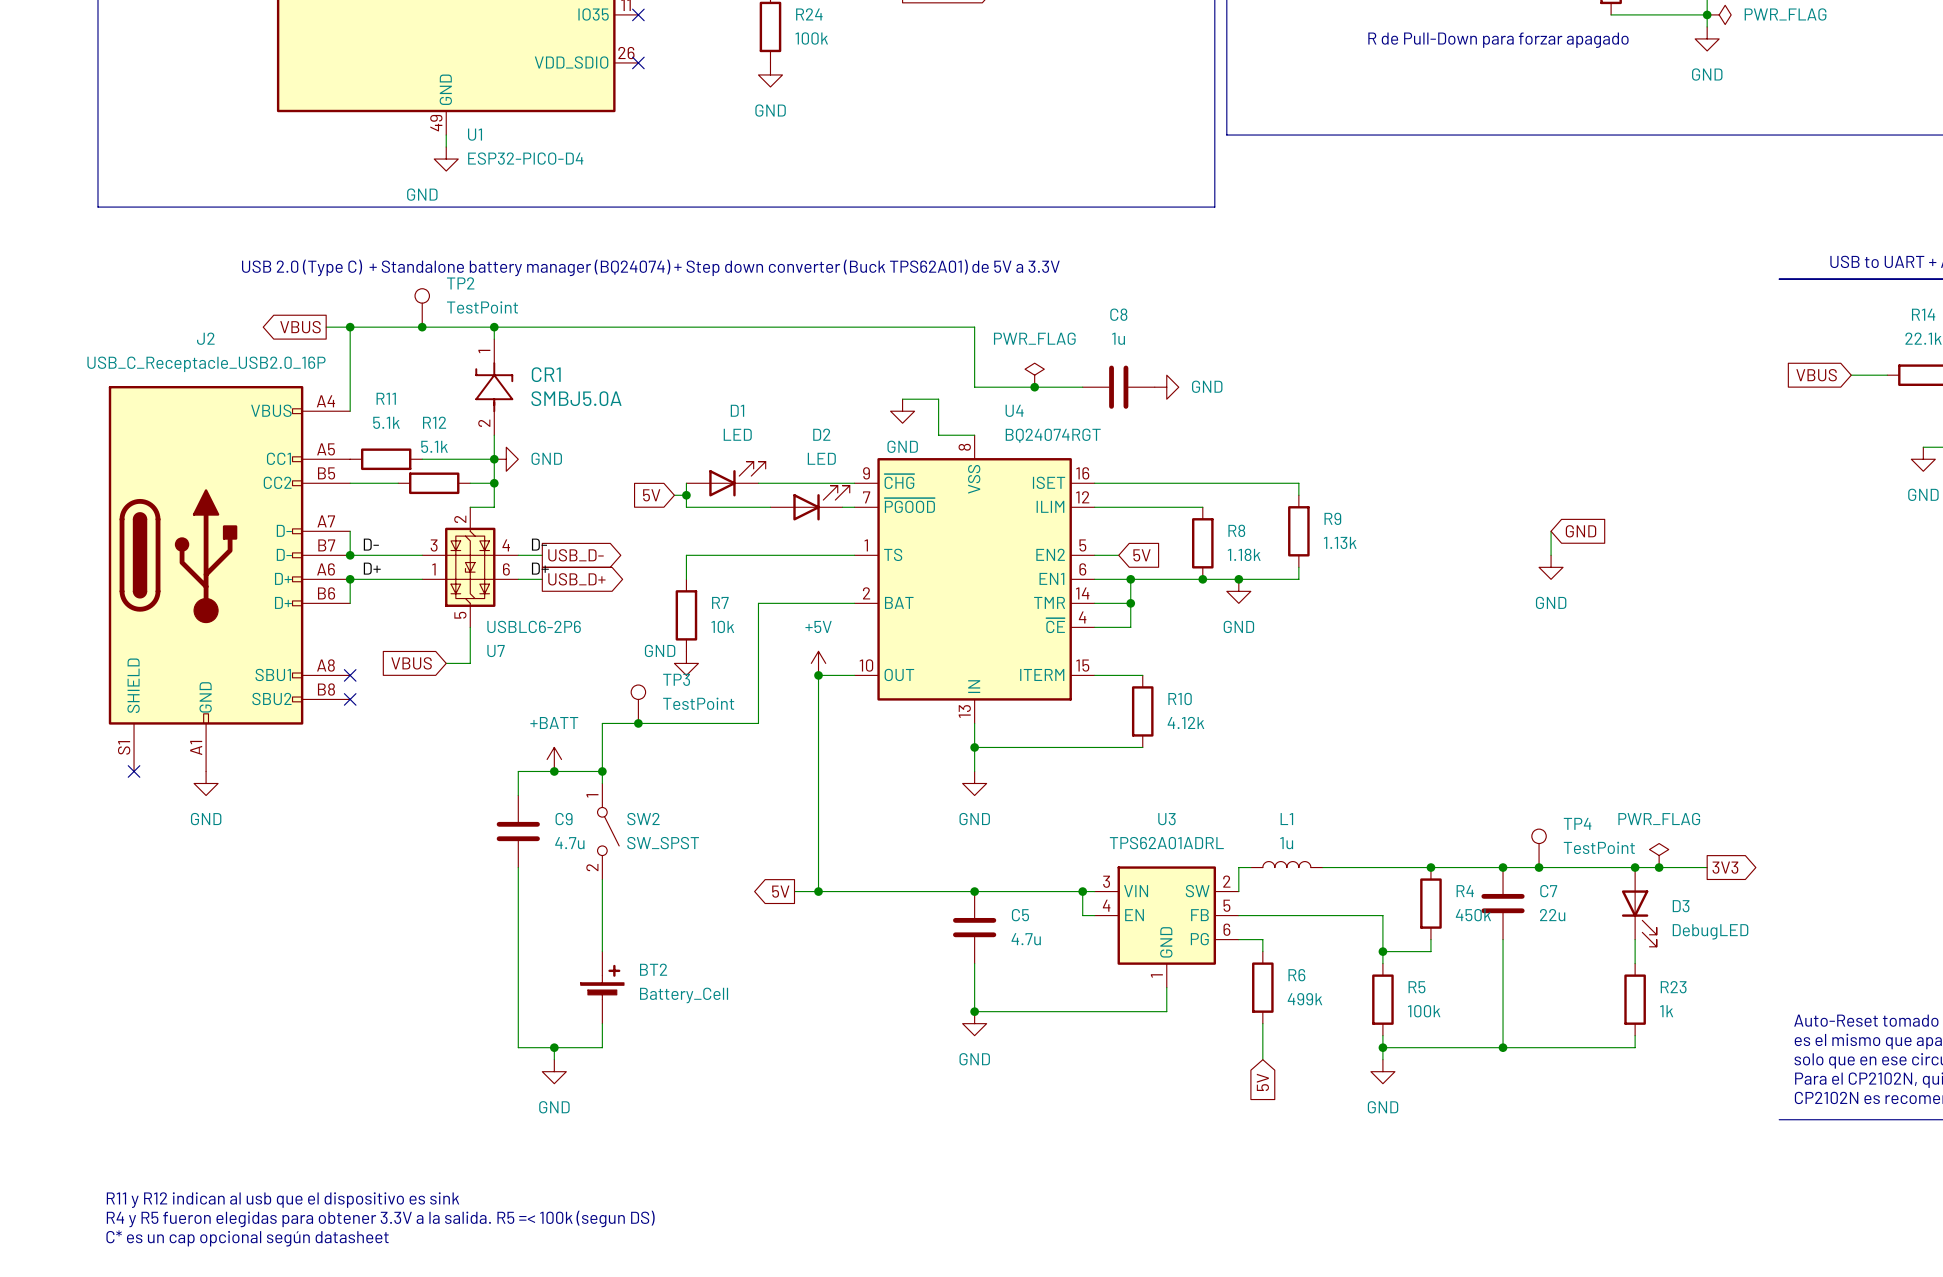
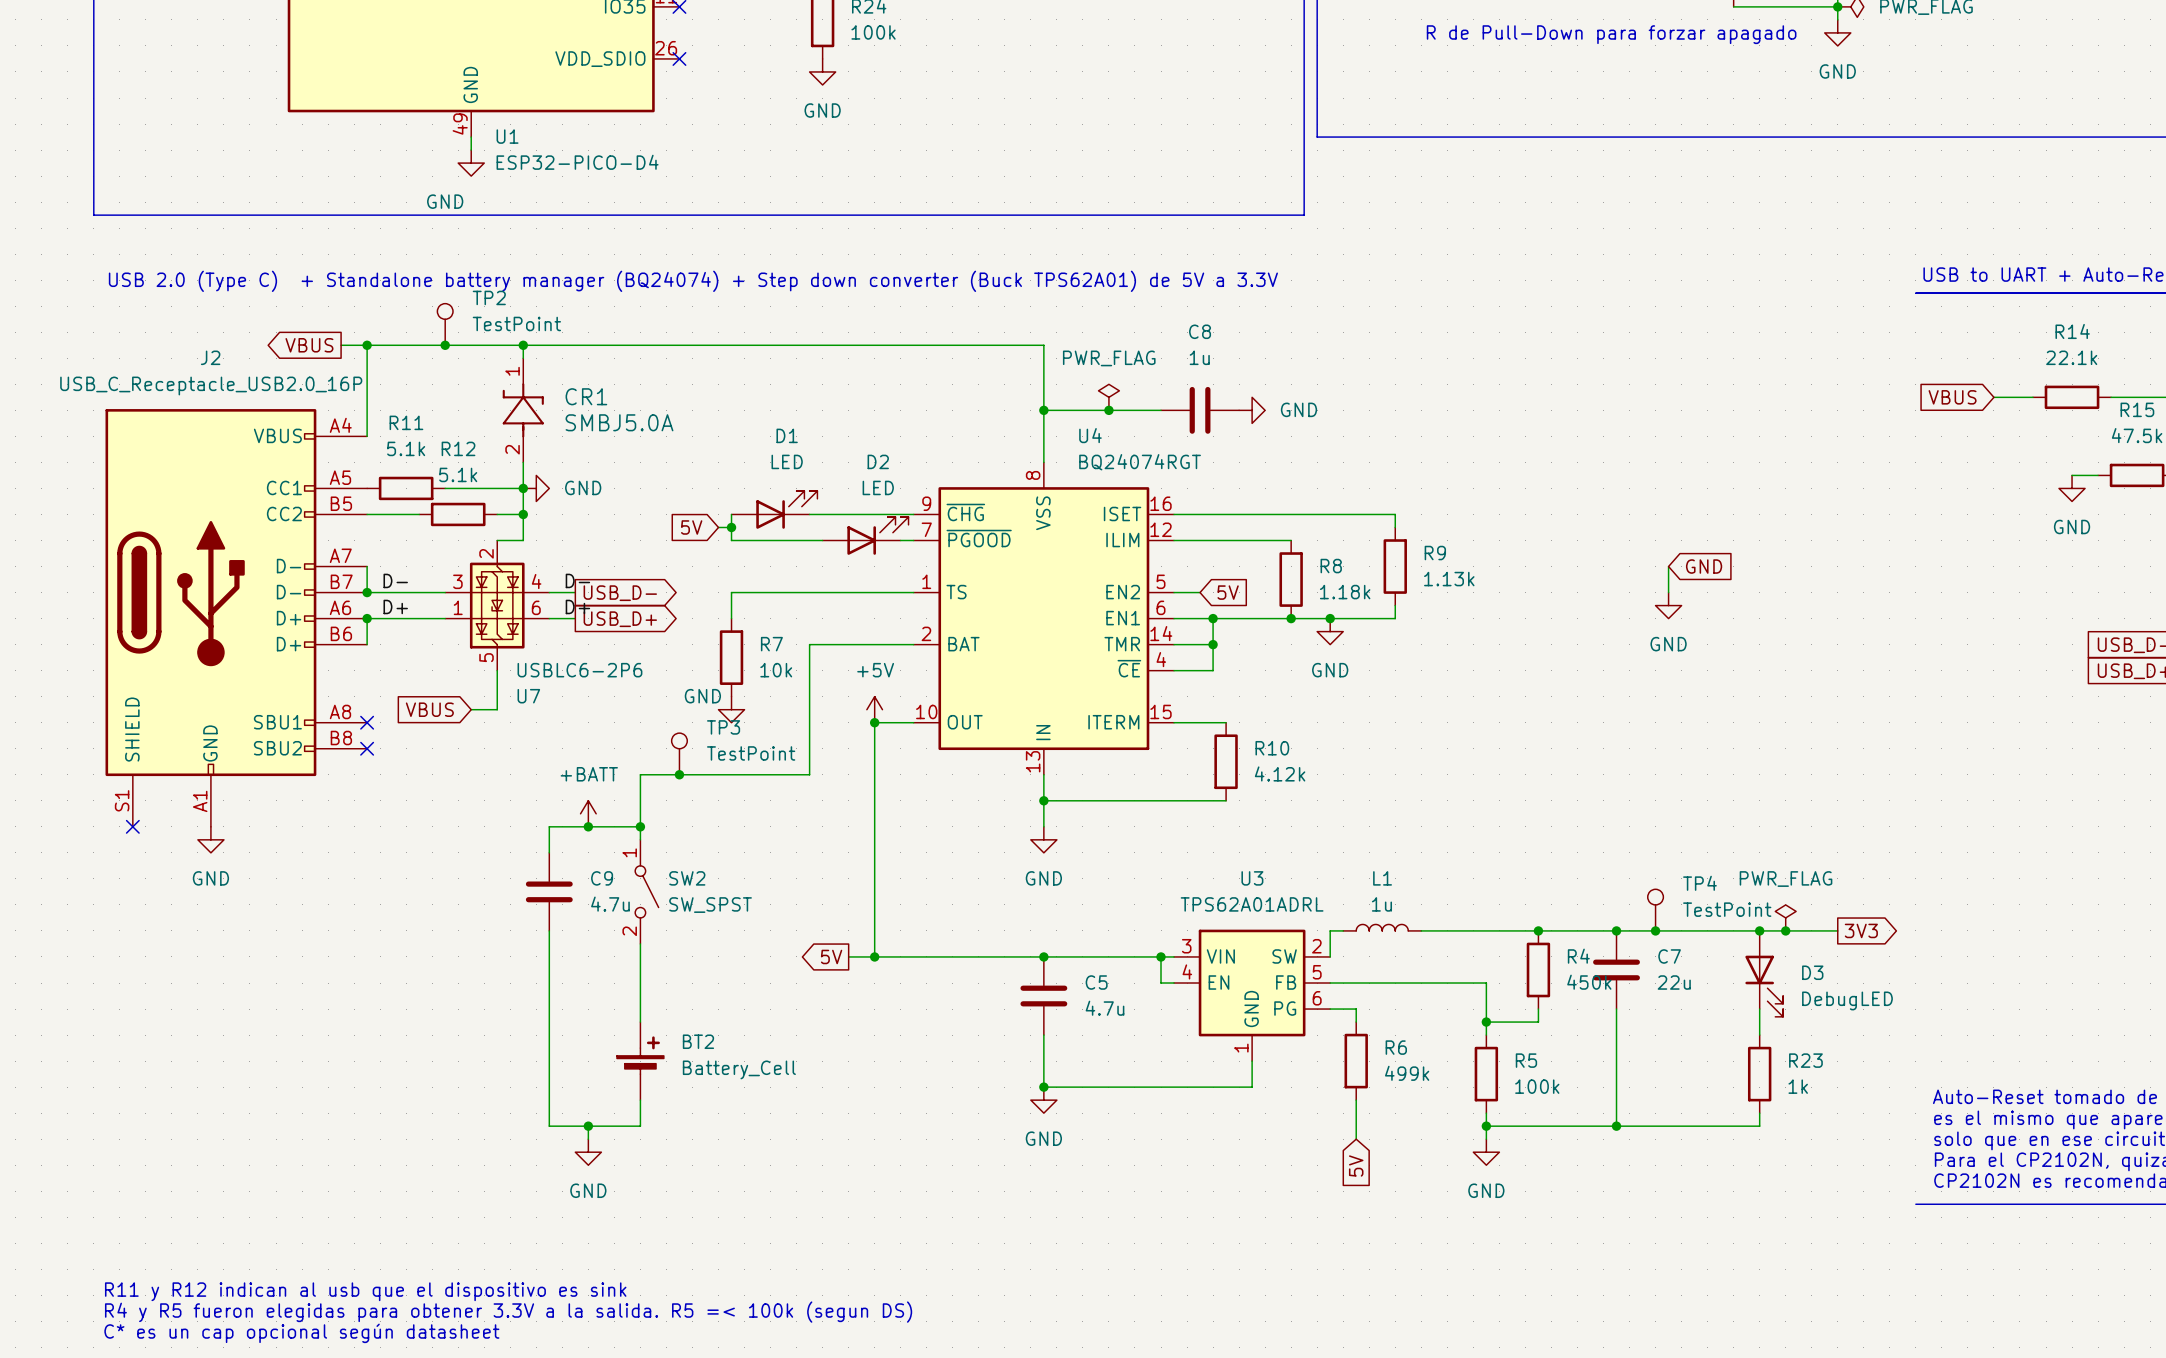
junction: none -> (1043, 410)
wire: (902, 399) (938, 399) (938, 435) (974, 435) -> (1043, 410) (1043, 462)
power symbol: GND (902, 411) -> none

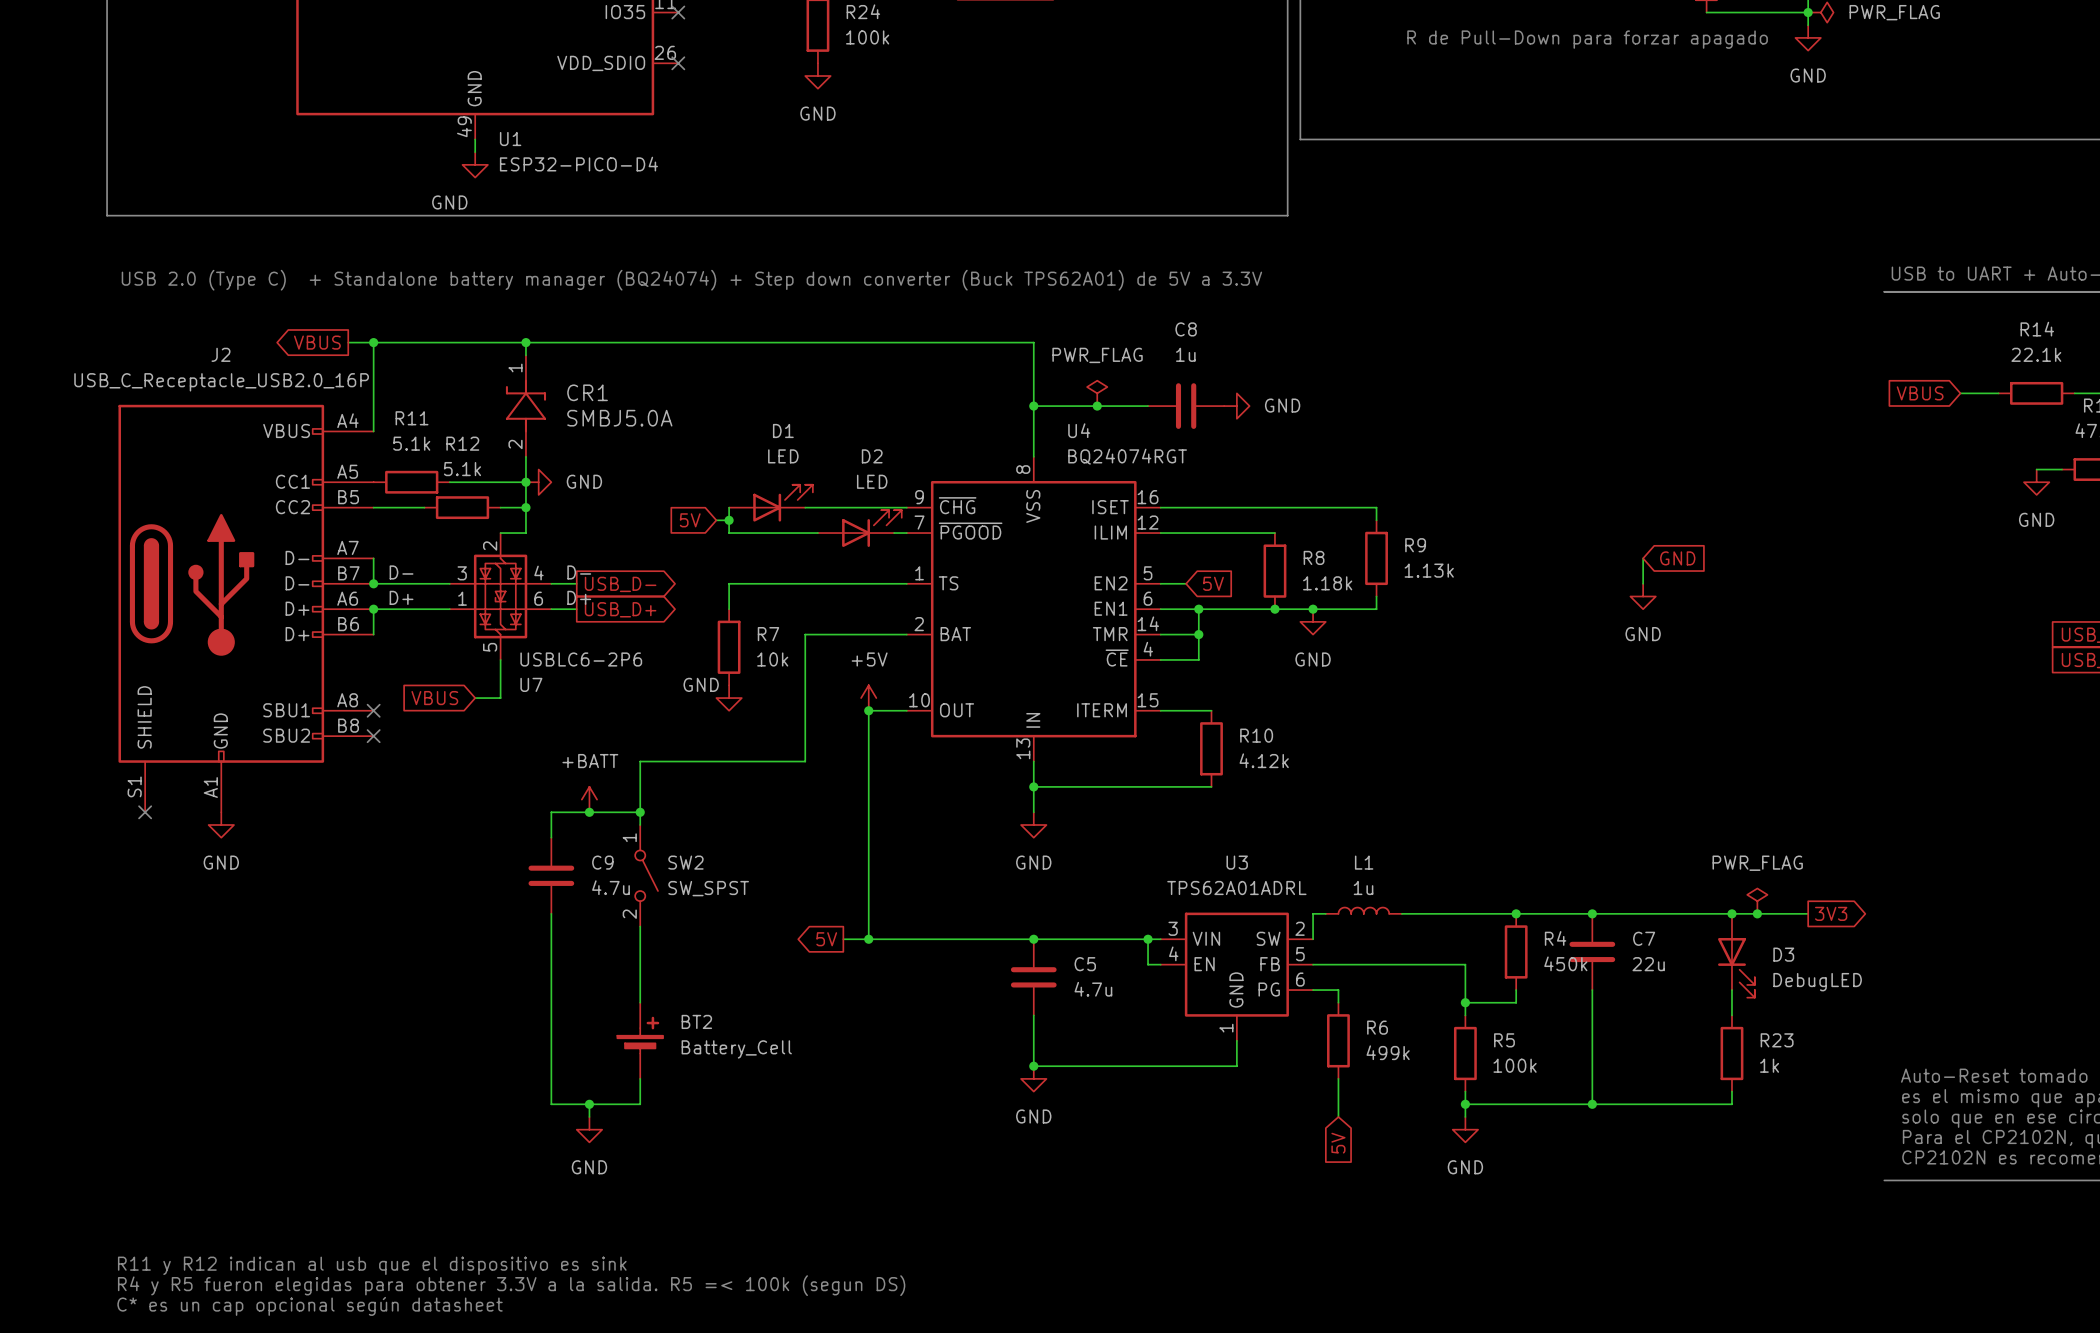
TP2: TestPoint (445, 324) -> none
junction: (445, 345) -> none
TP3: TestPoint (679, 753) -> none
junction: (679, 774) -> none
TP4: TestPoint (1655, 910) -> none
junction: (1655, 930) -> none

